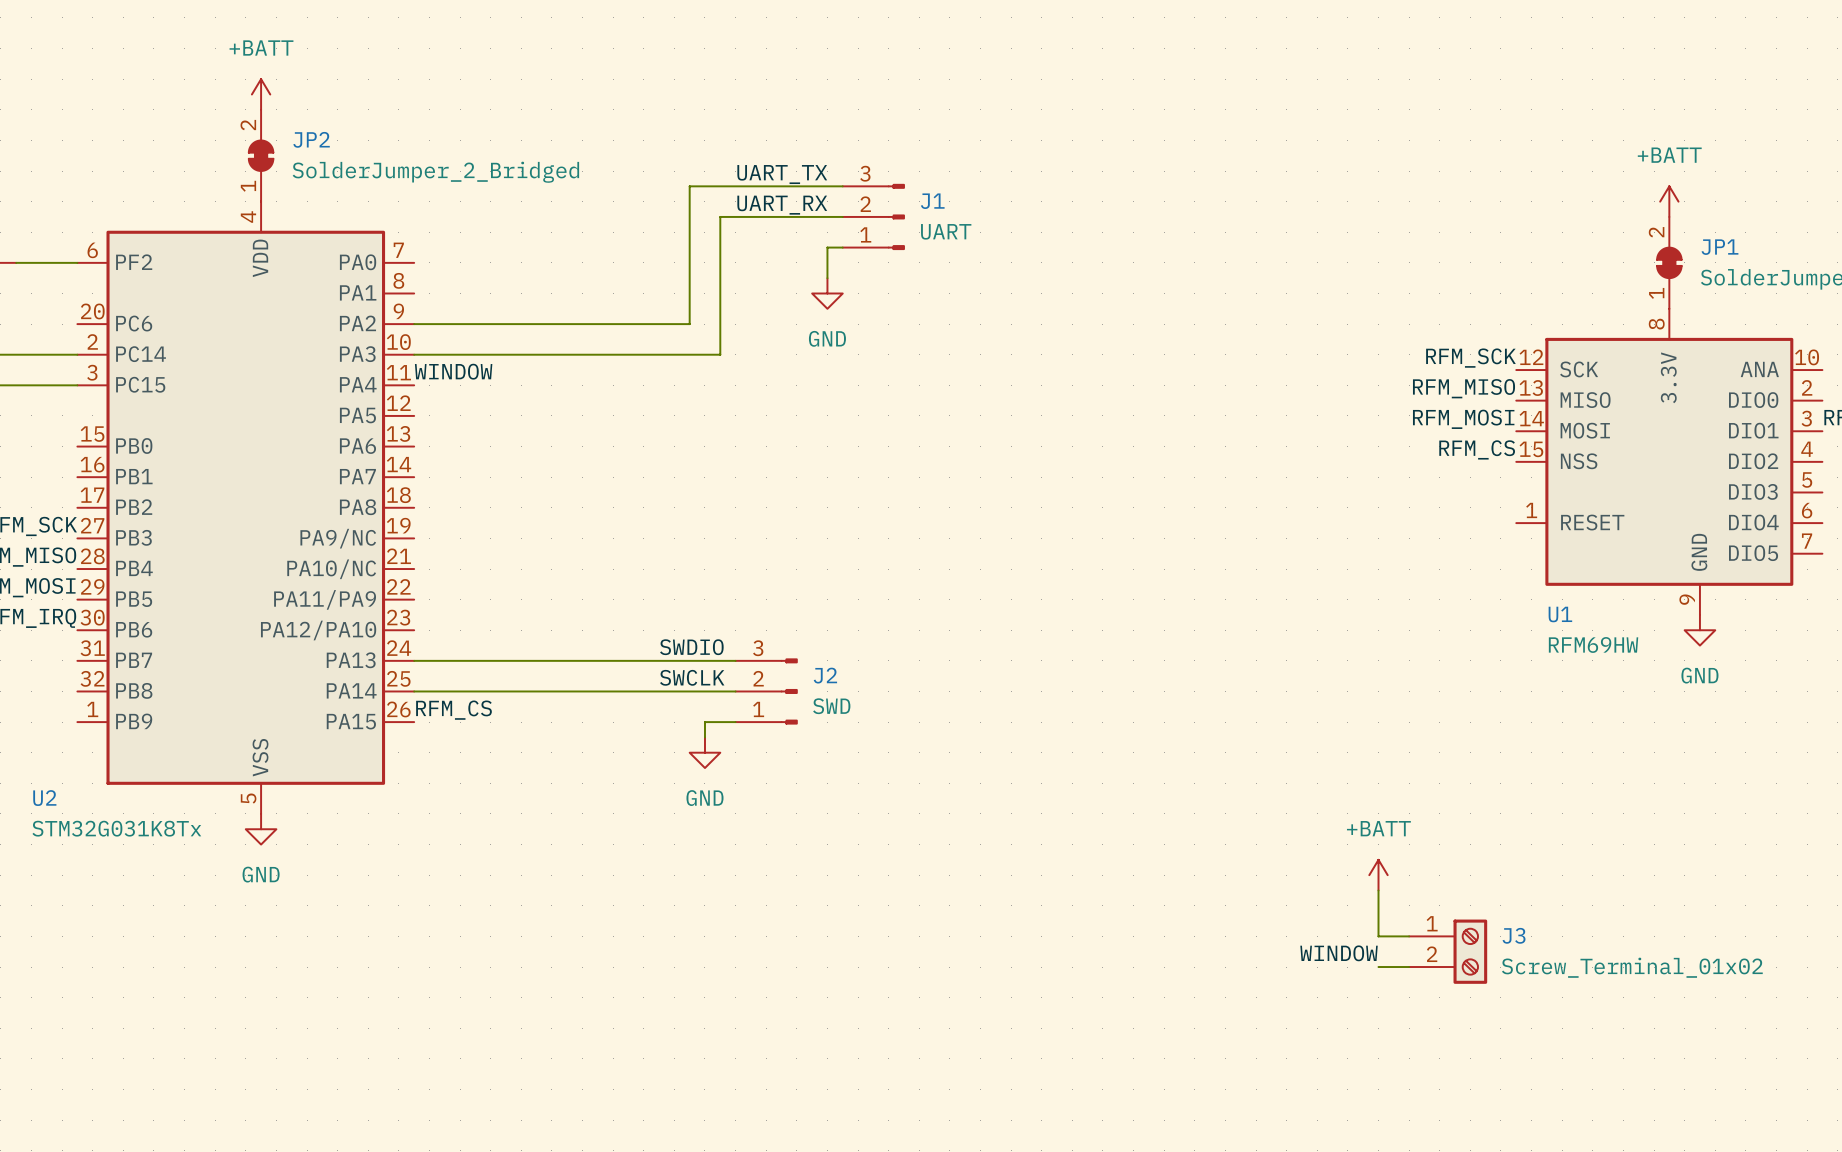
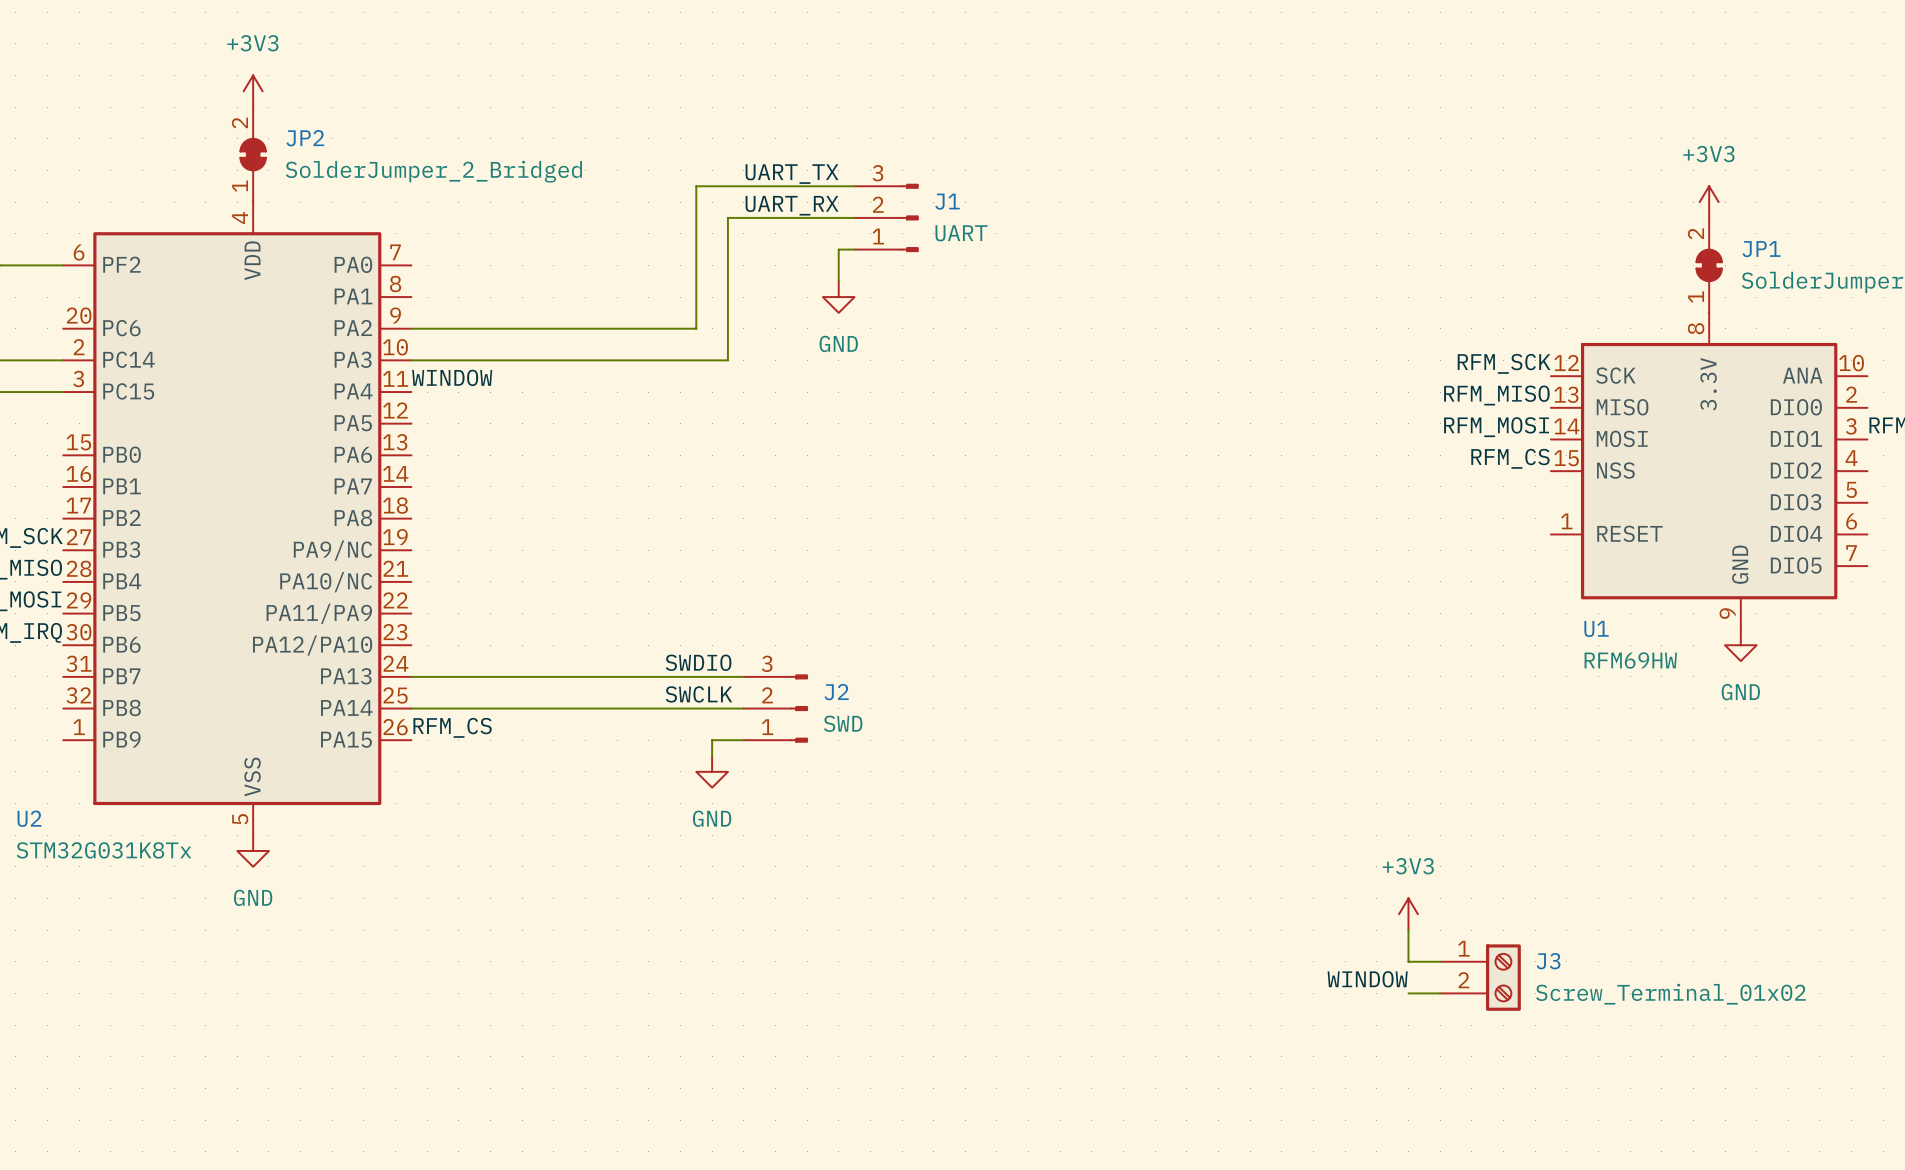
power symbol: +BATT (261, 94) -> +3V3 (253, 91)
power symbol: +BATT (1669, 201) -> +3V3 (1709, 202)
power symbol: +BATT (1378, 875) -> none
power symbol: none -> +3V3 (1408, 914)

